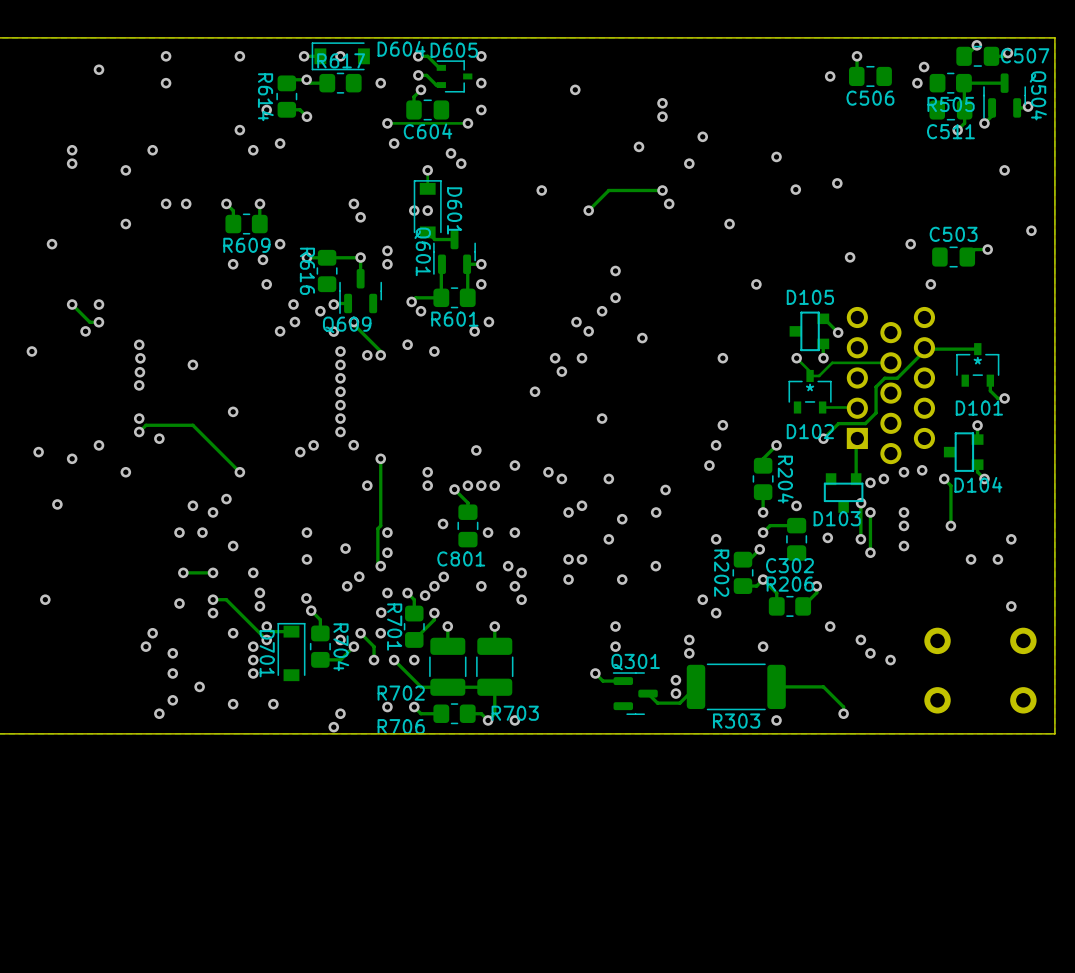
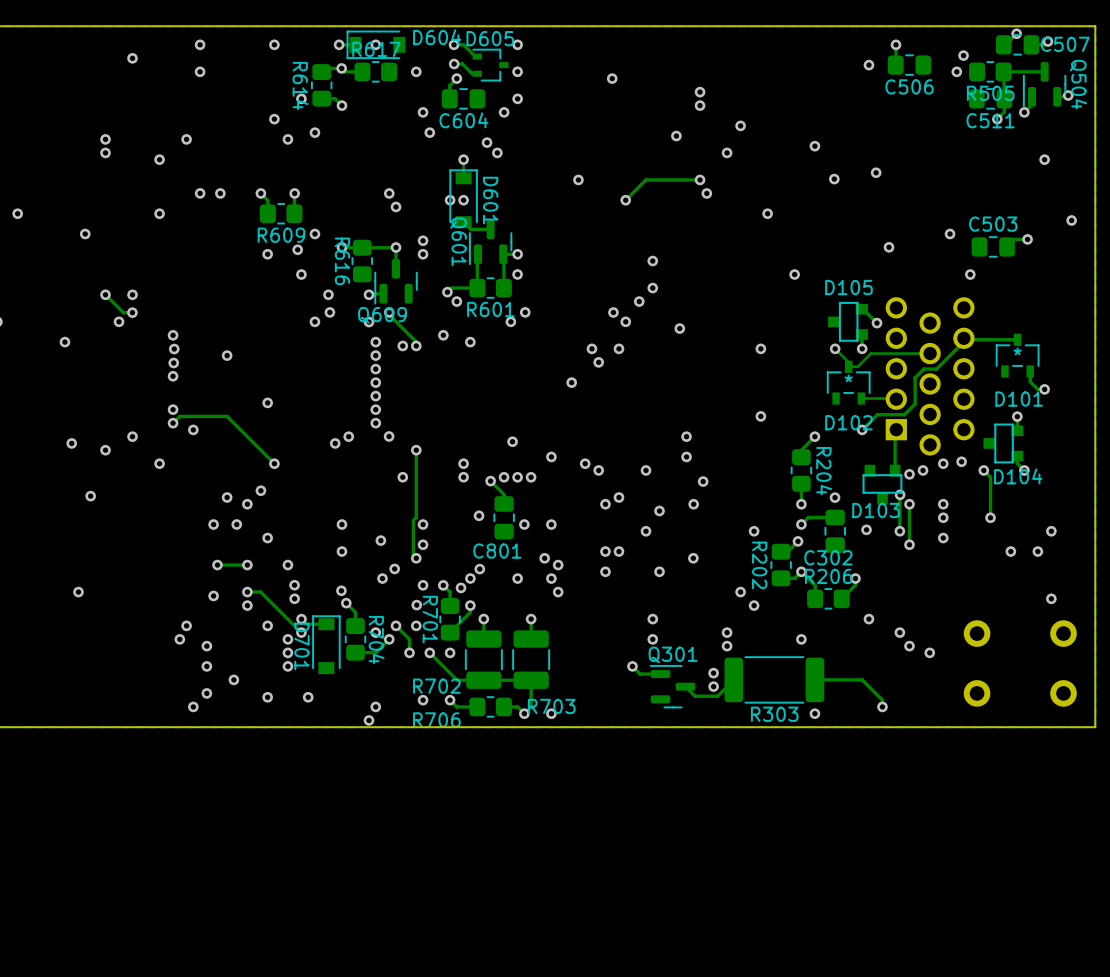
track: (467, 123) (387, 123) -> none
via: (320, 311) -> none
via: (602, 418) -> none
via: none -> (686, 436)
via: (716, 445) -> none
via: none -> (686, 456)
via: (709, 465) -> none

